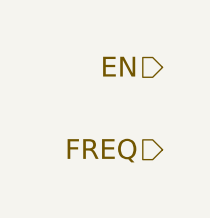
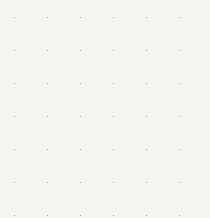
hierarchical label: EN (119, 66) -> none
hierarchical label: FREQ (101, 150) -> none

